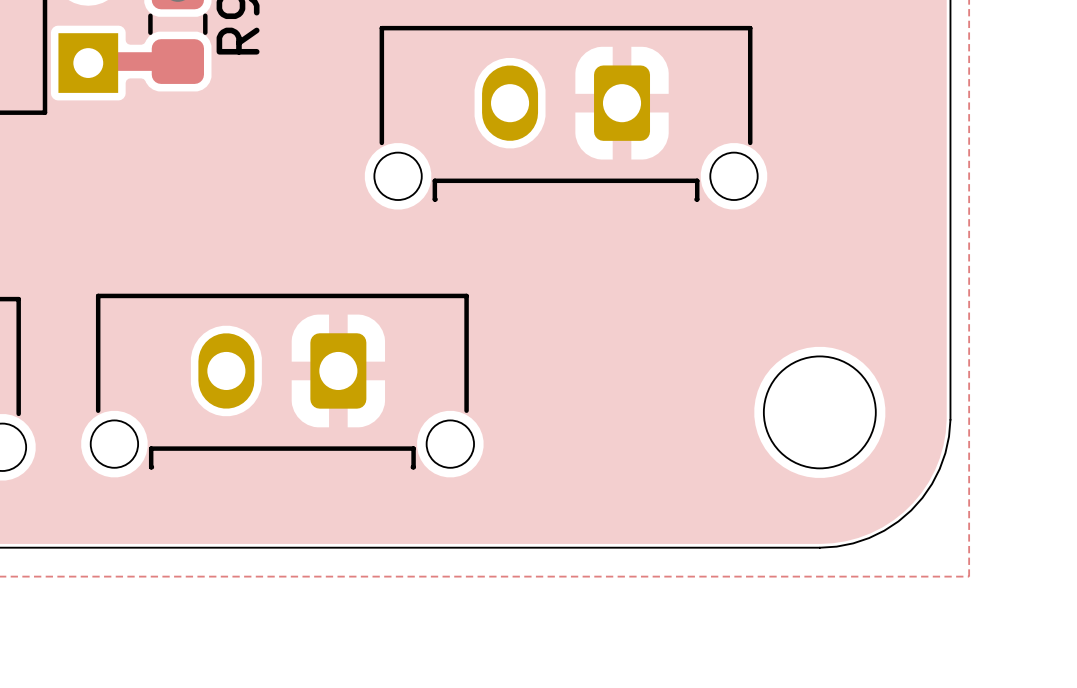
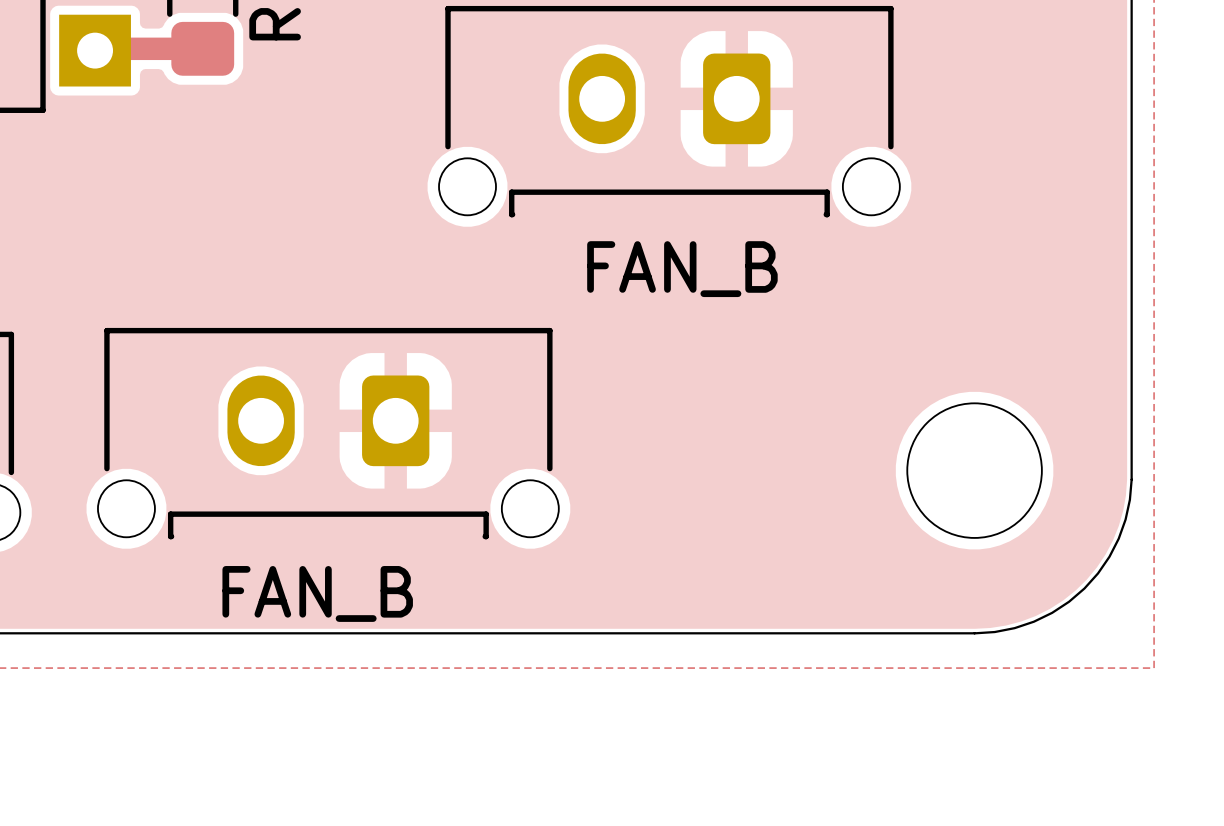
text: none -> FAN_B (682, 269)
text: none -> FAN_B (317, 593)

